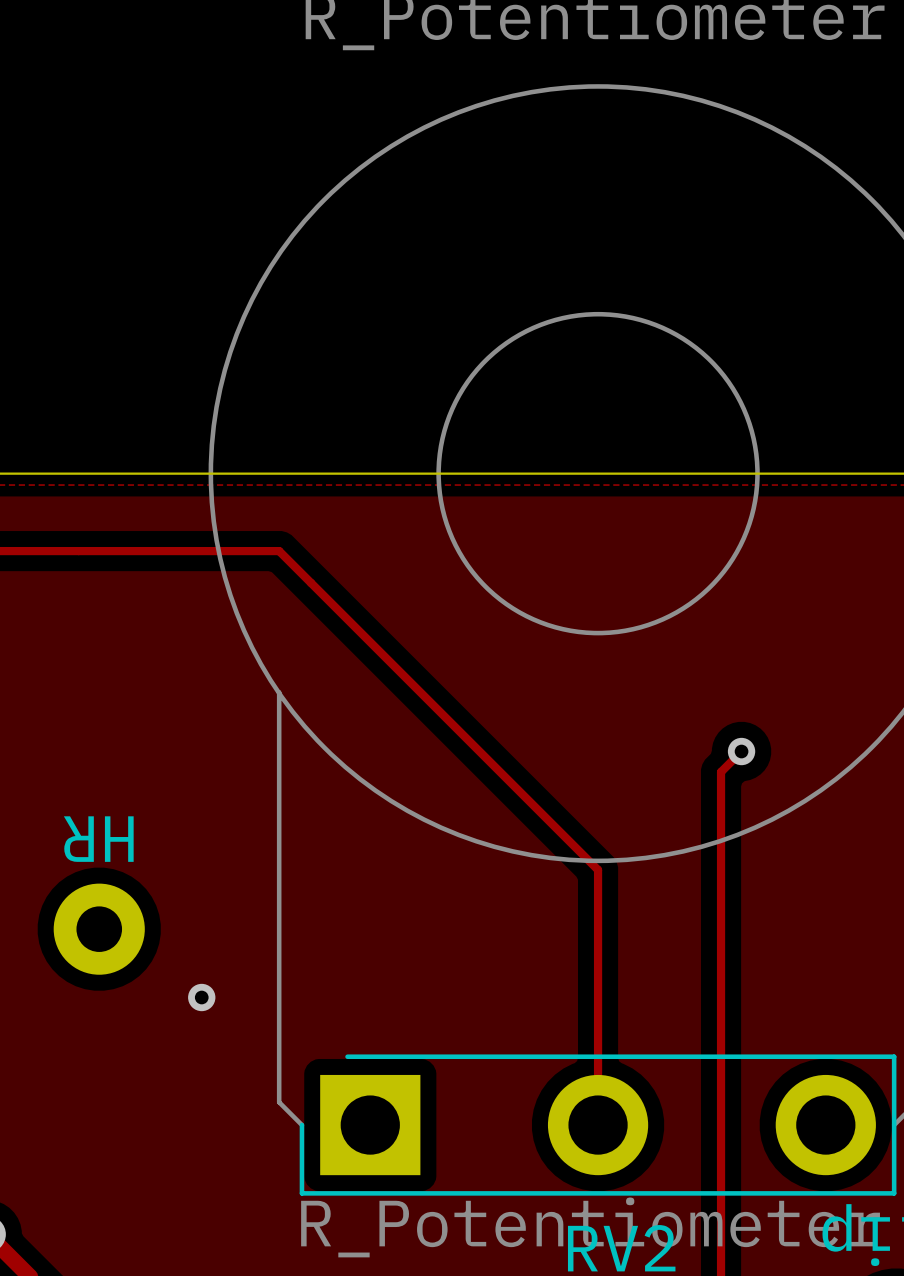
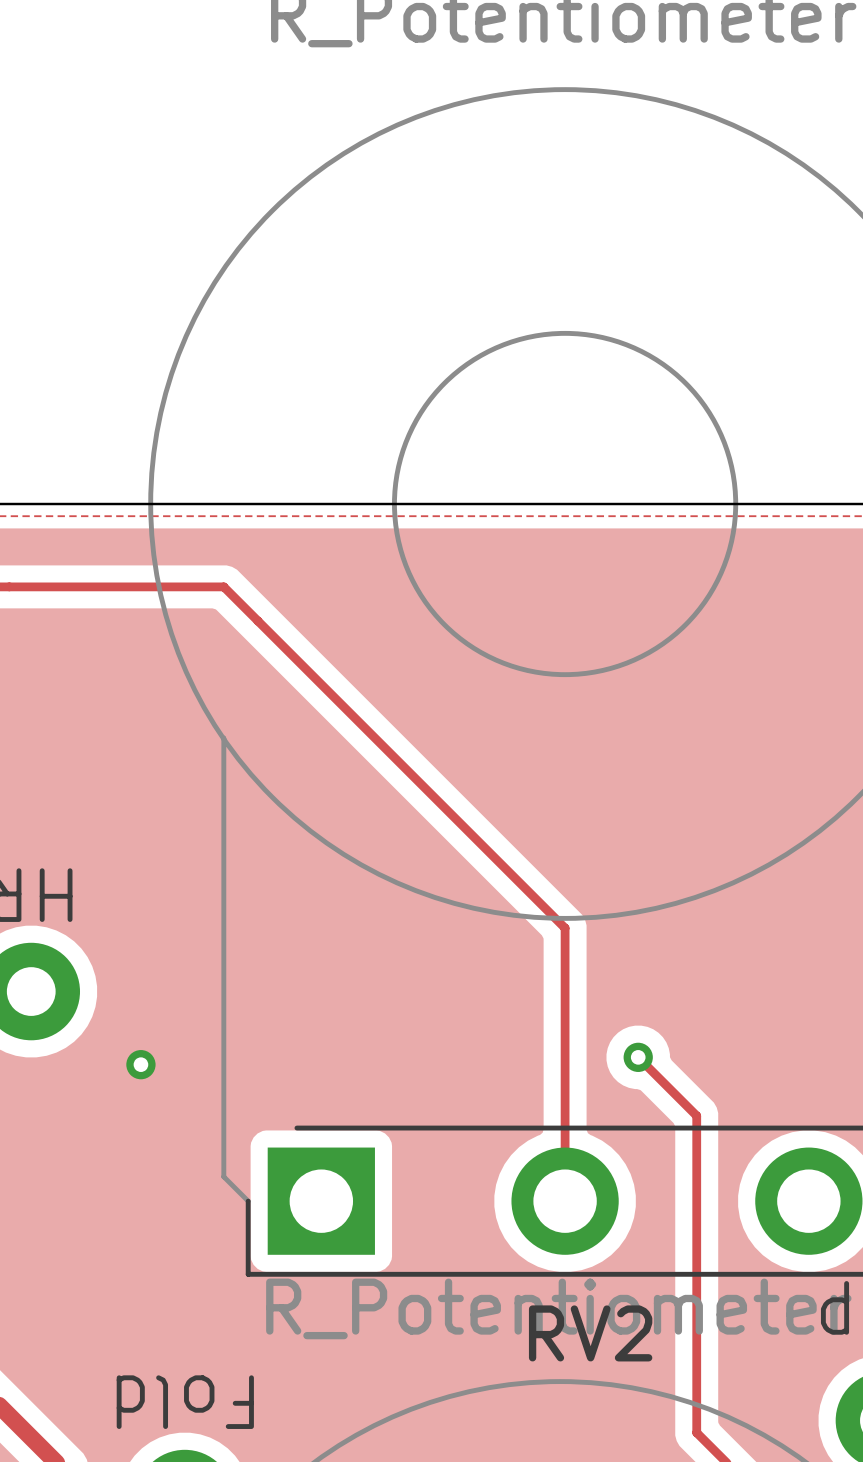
track: (741, 751) (721, 772) (721, 1045) -> (638, 1057) (696, 1115)
via position: (741, 751) -> (638, 1057)

